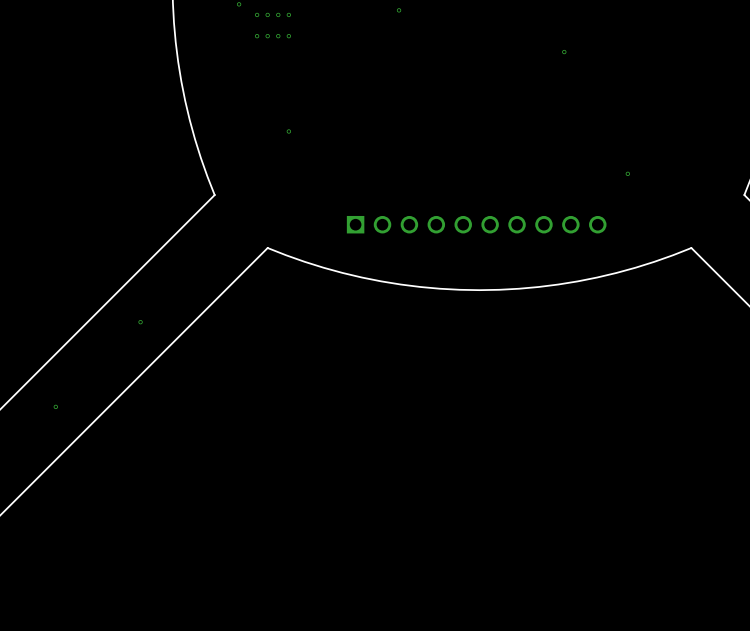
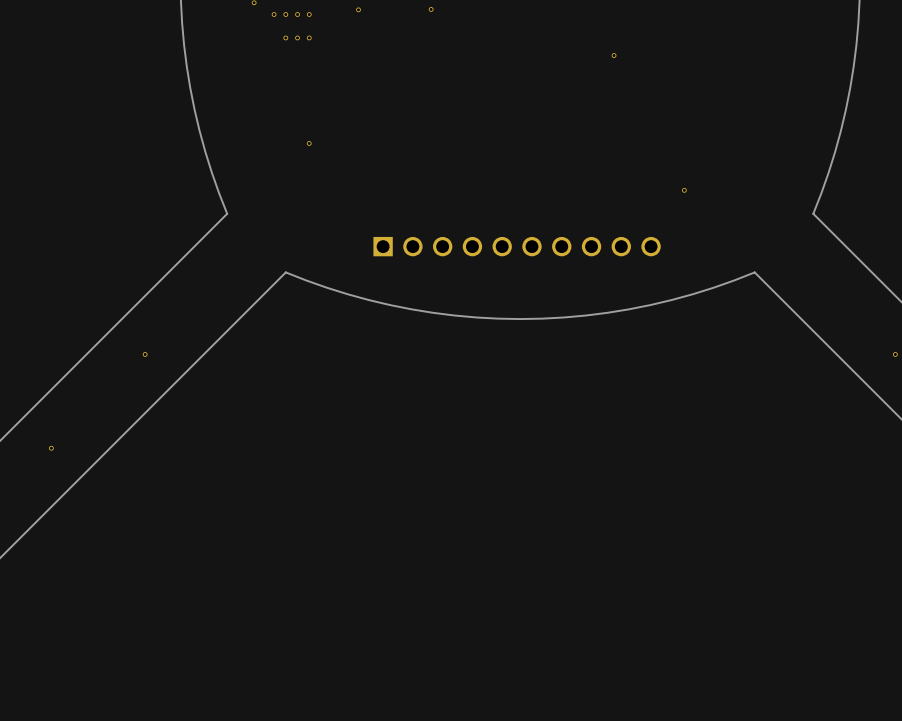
part position: (257, 36) -> (358, 9)

